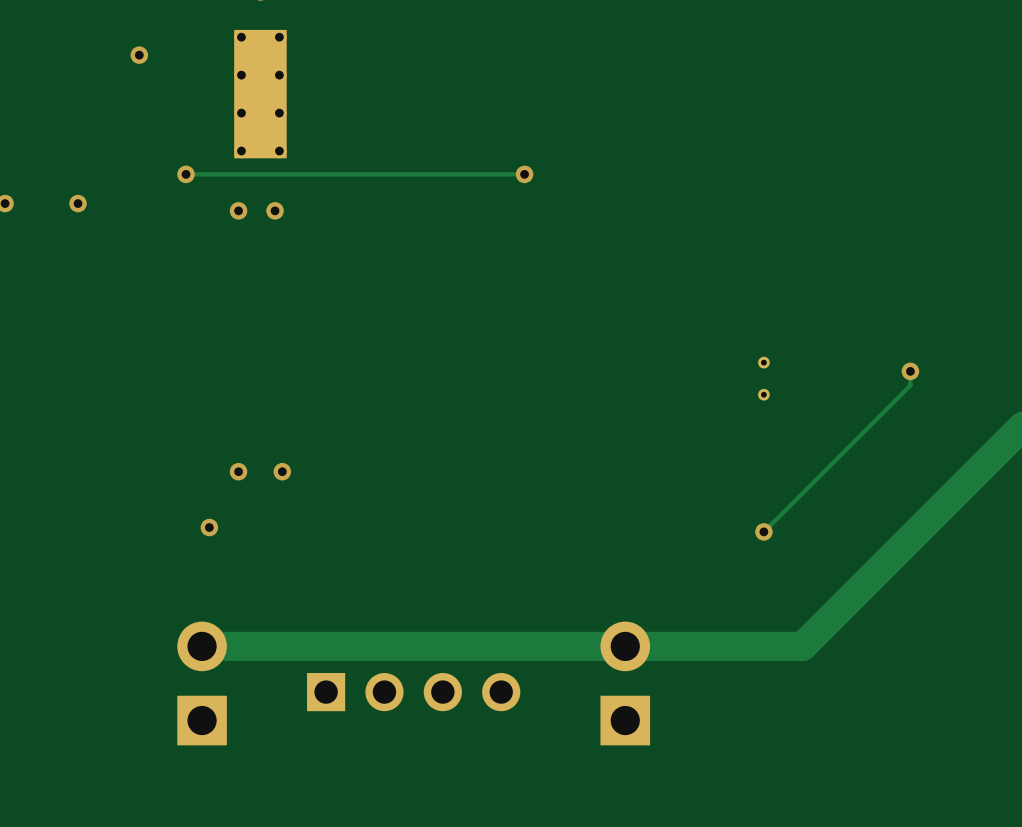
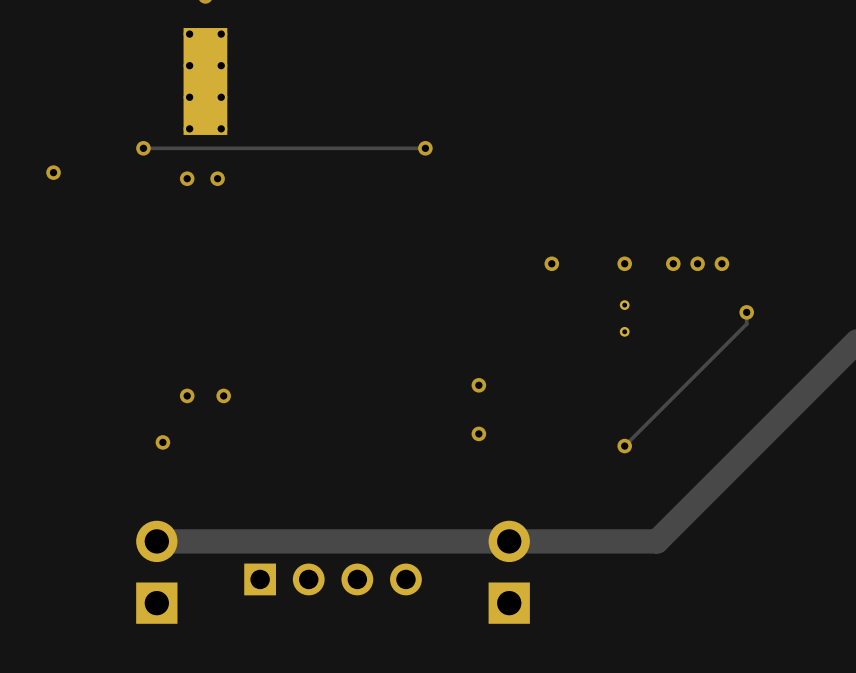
via: (139, 55) -> none
via: none -> (551, 263)
via: none -> (624, 263)
via: none -> (673, 263)
via: none -> (697, 263)
via: none -> (721, 263)
via: none -> (478, 385)
via: none -> (478, 433)

